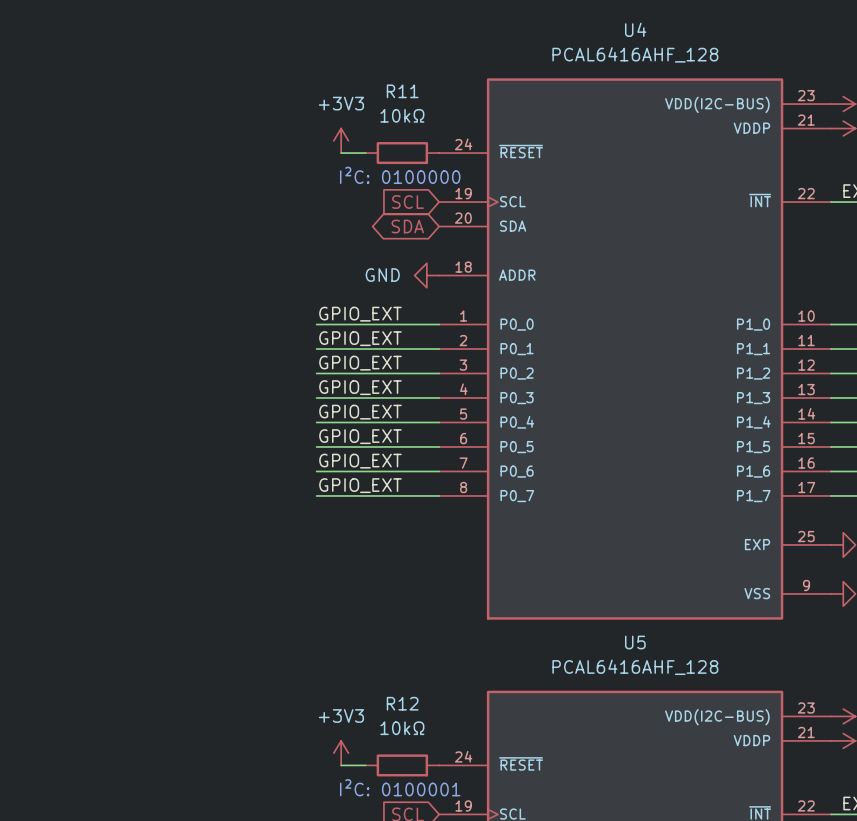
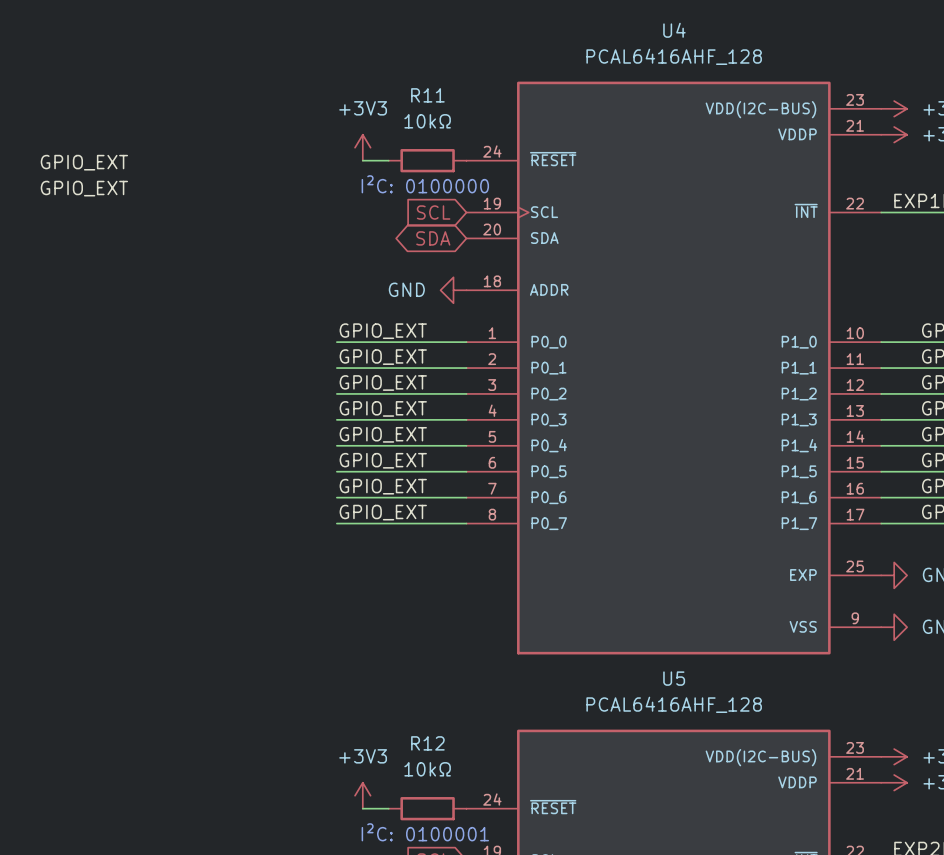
label: none -> GPIO_EXT (84, 162)
label: none -> GPIO_EXT (84, 188)

